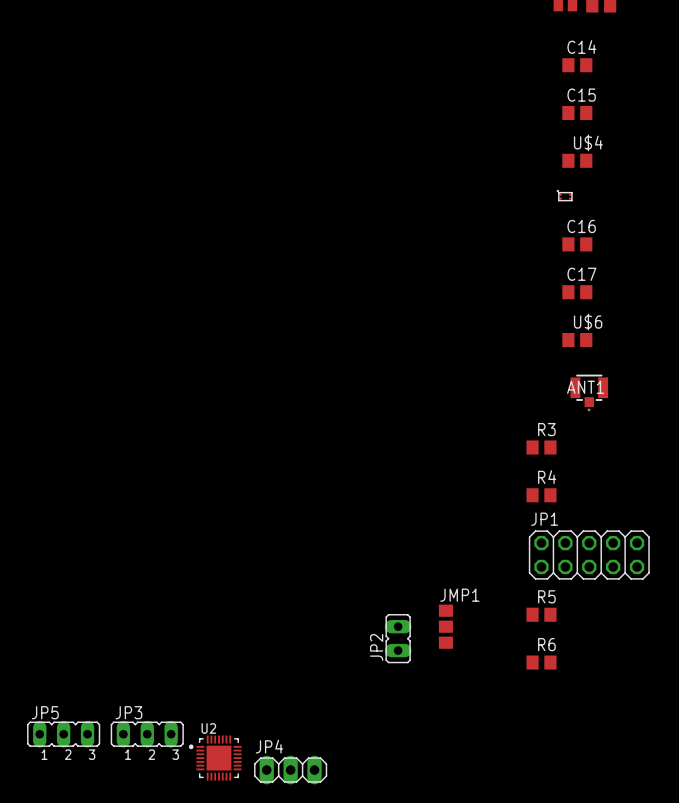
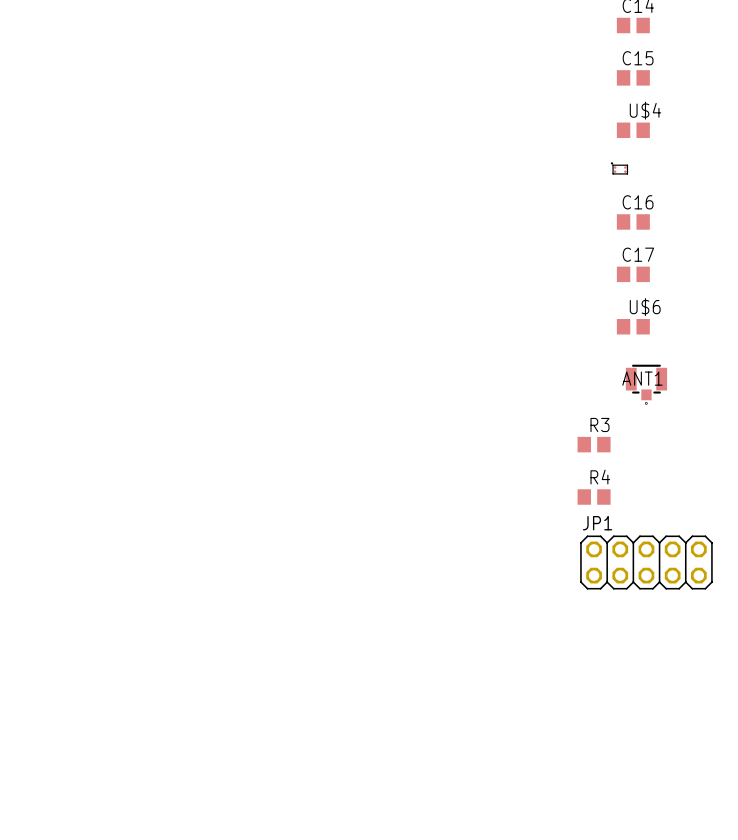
R5: (541, 614) -> none
JMP1: (445, 626) -> none
JP2: (398, 638) -> none
R6: (541, 662) -> none
JP5: (63, 734) -> none
JP3: (147, 734) -> none
U2: (215, 758) -> none
JP4: (290, 770) -> none

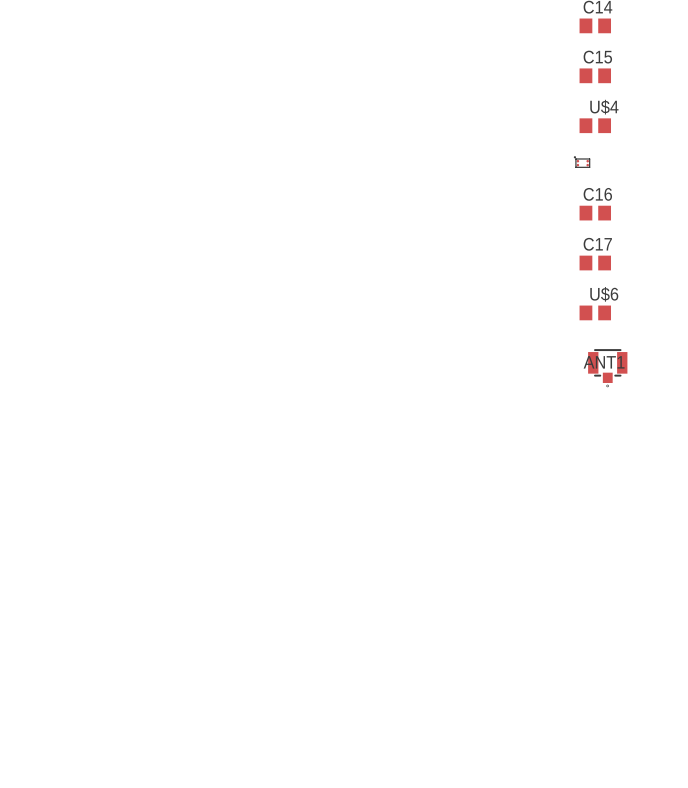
R3: (594, 444) -> none
R4: (594, 497) -> none
JP1: (646, 562) -> none

